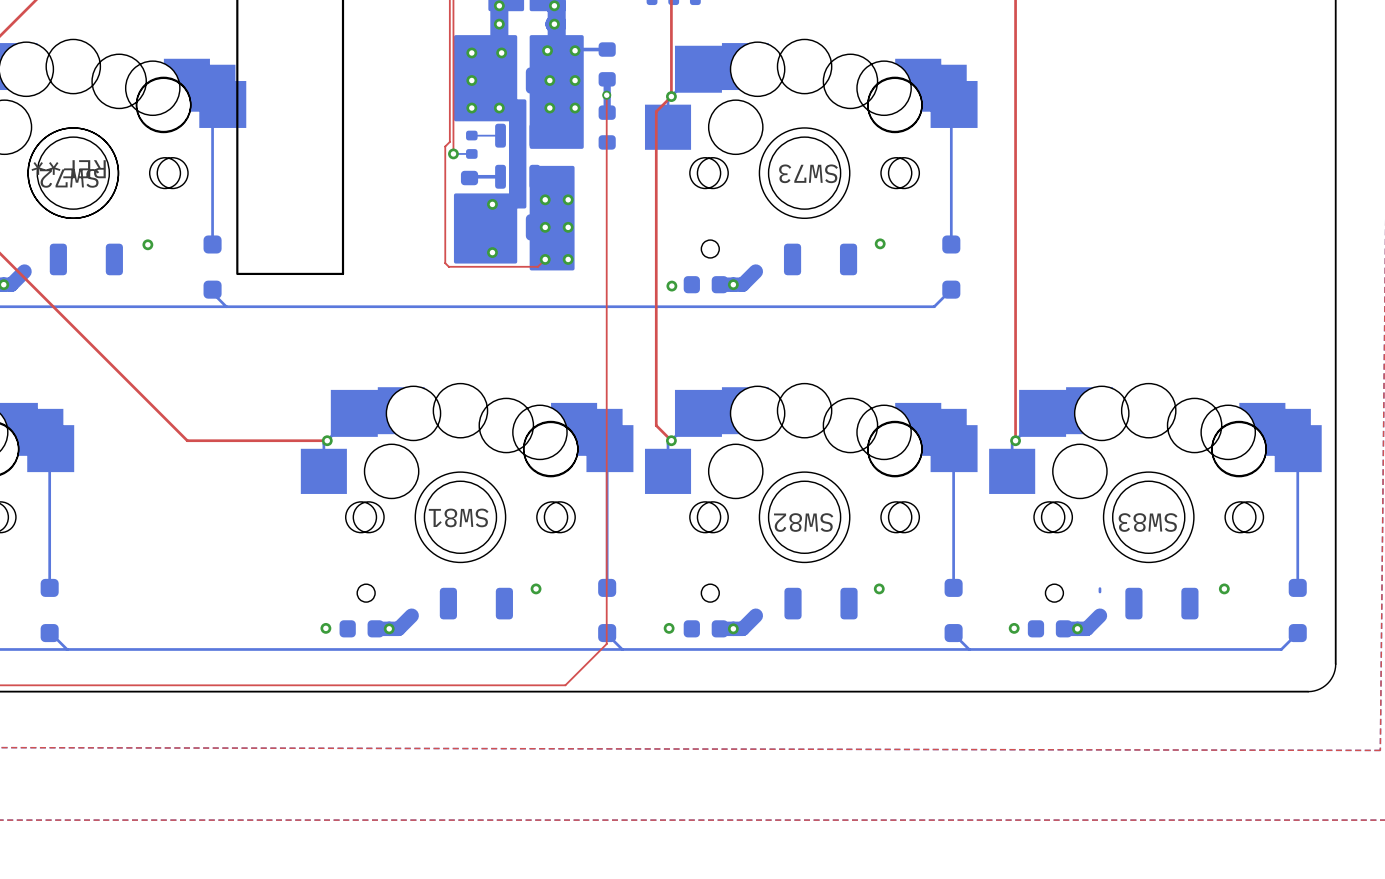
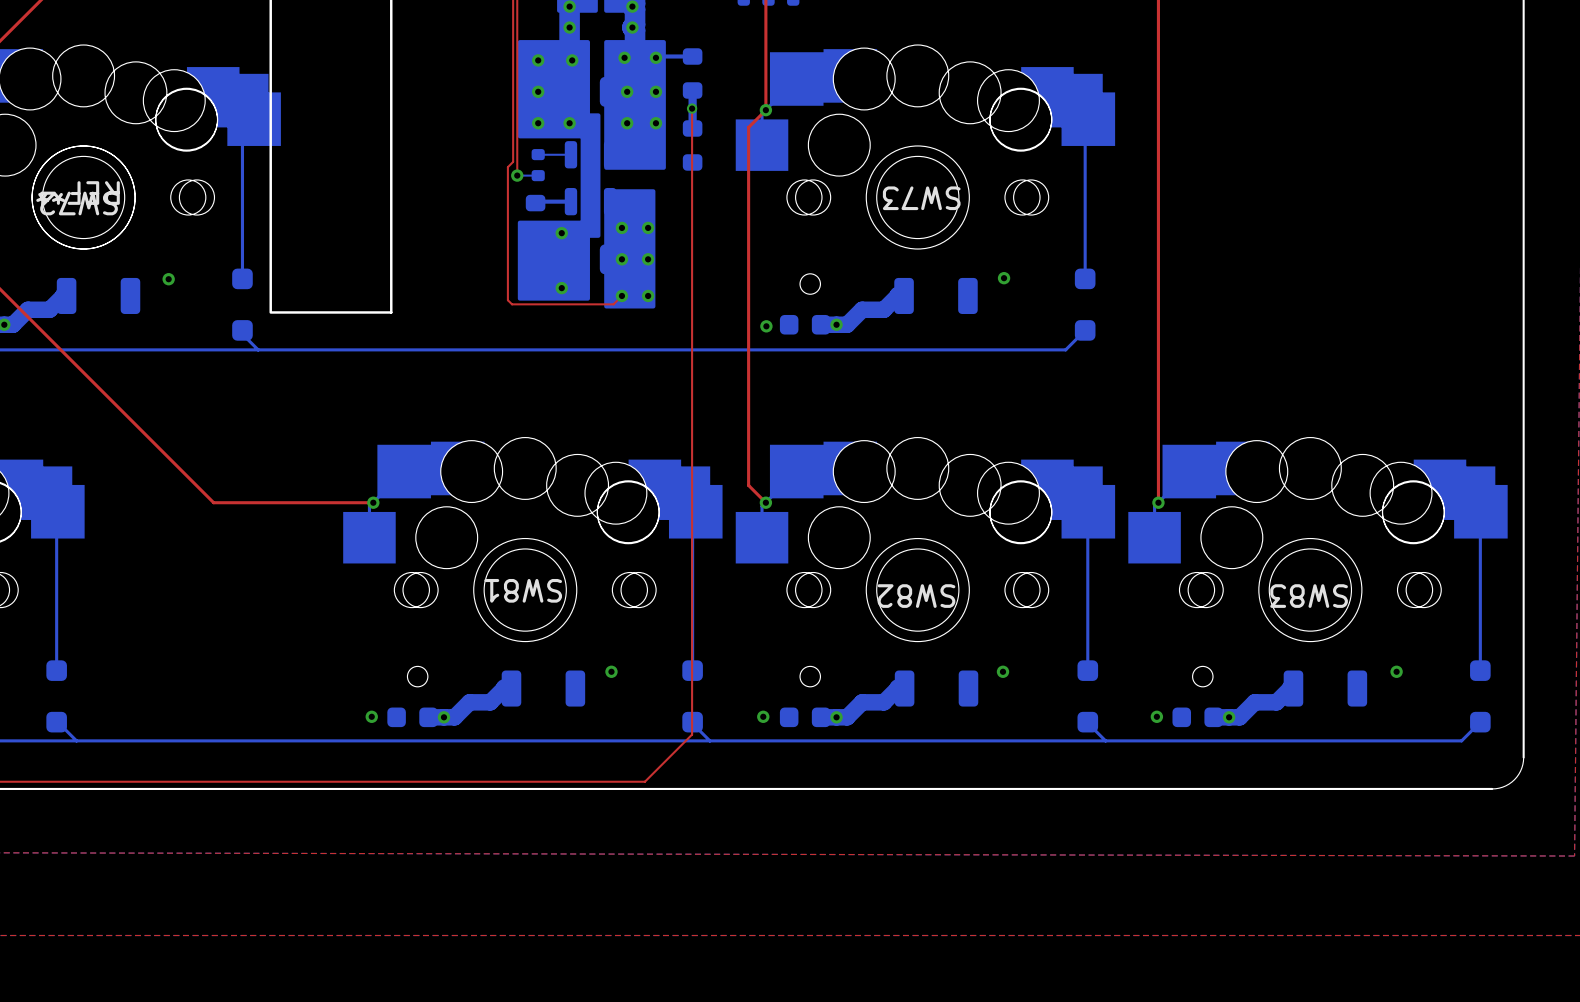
bottom track: none -> (63, 294) (49, 309) (27, 309)
bottom track: none -> (897, 294) (883, 309) (862, 309)
bottom track: (1099, 588) (1099, 592) -> none
bottom track: none -> (504, 687) (490, 702) (469, 702)
bottom track: none -> (897, 687) (883, 702) (862, 702)
bottom track: none -> (1290, 687) (1276, 702) (1254, 702)

